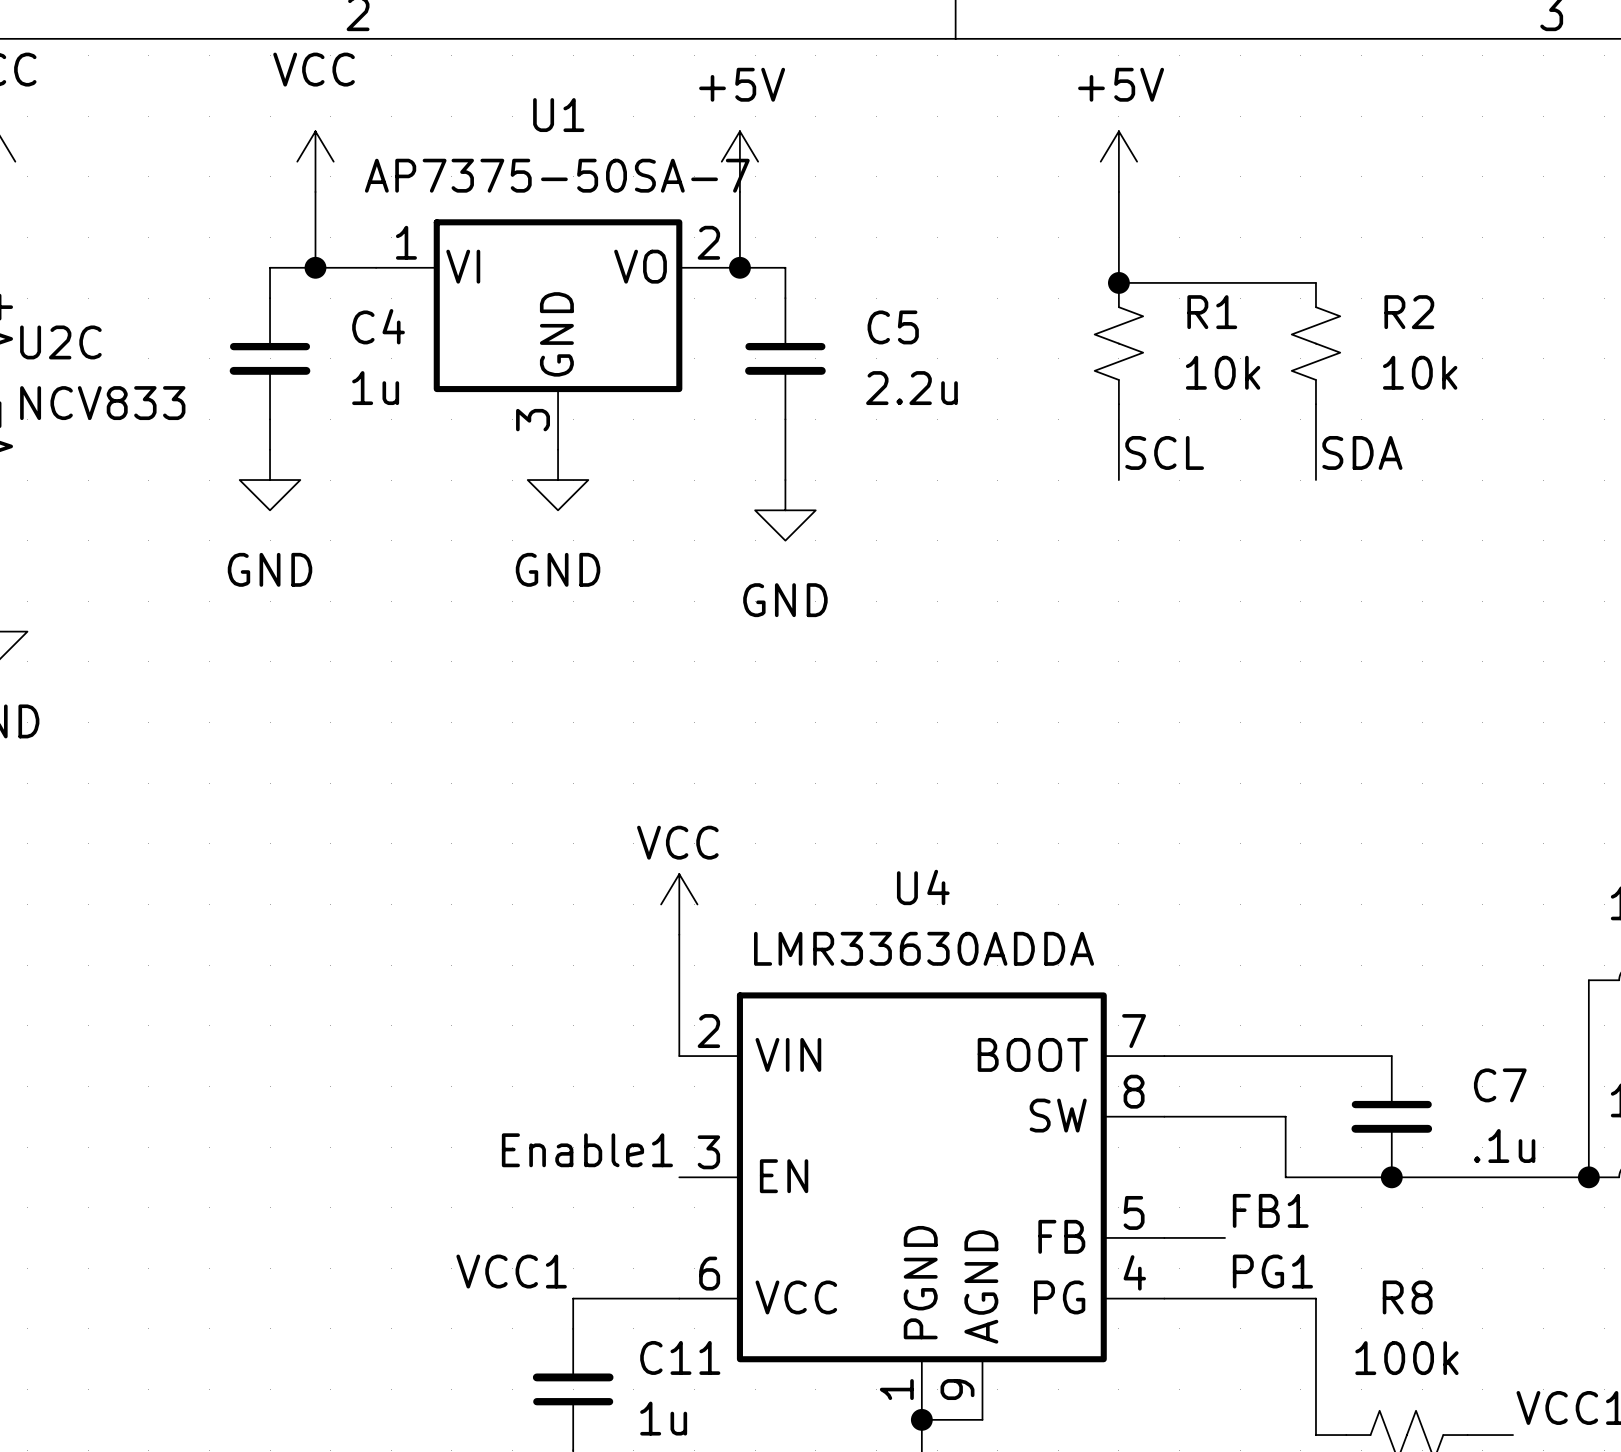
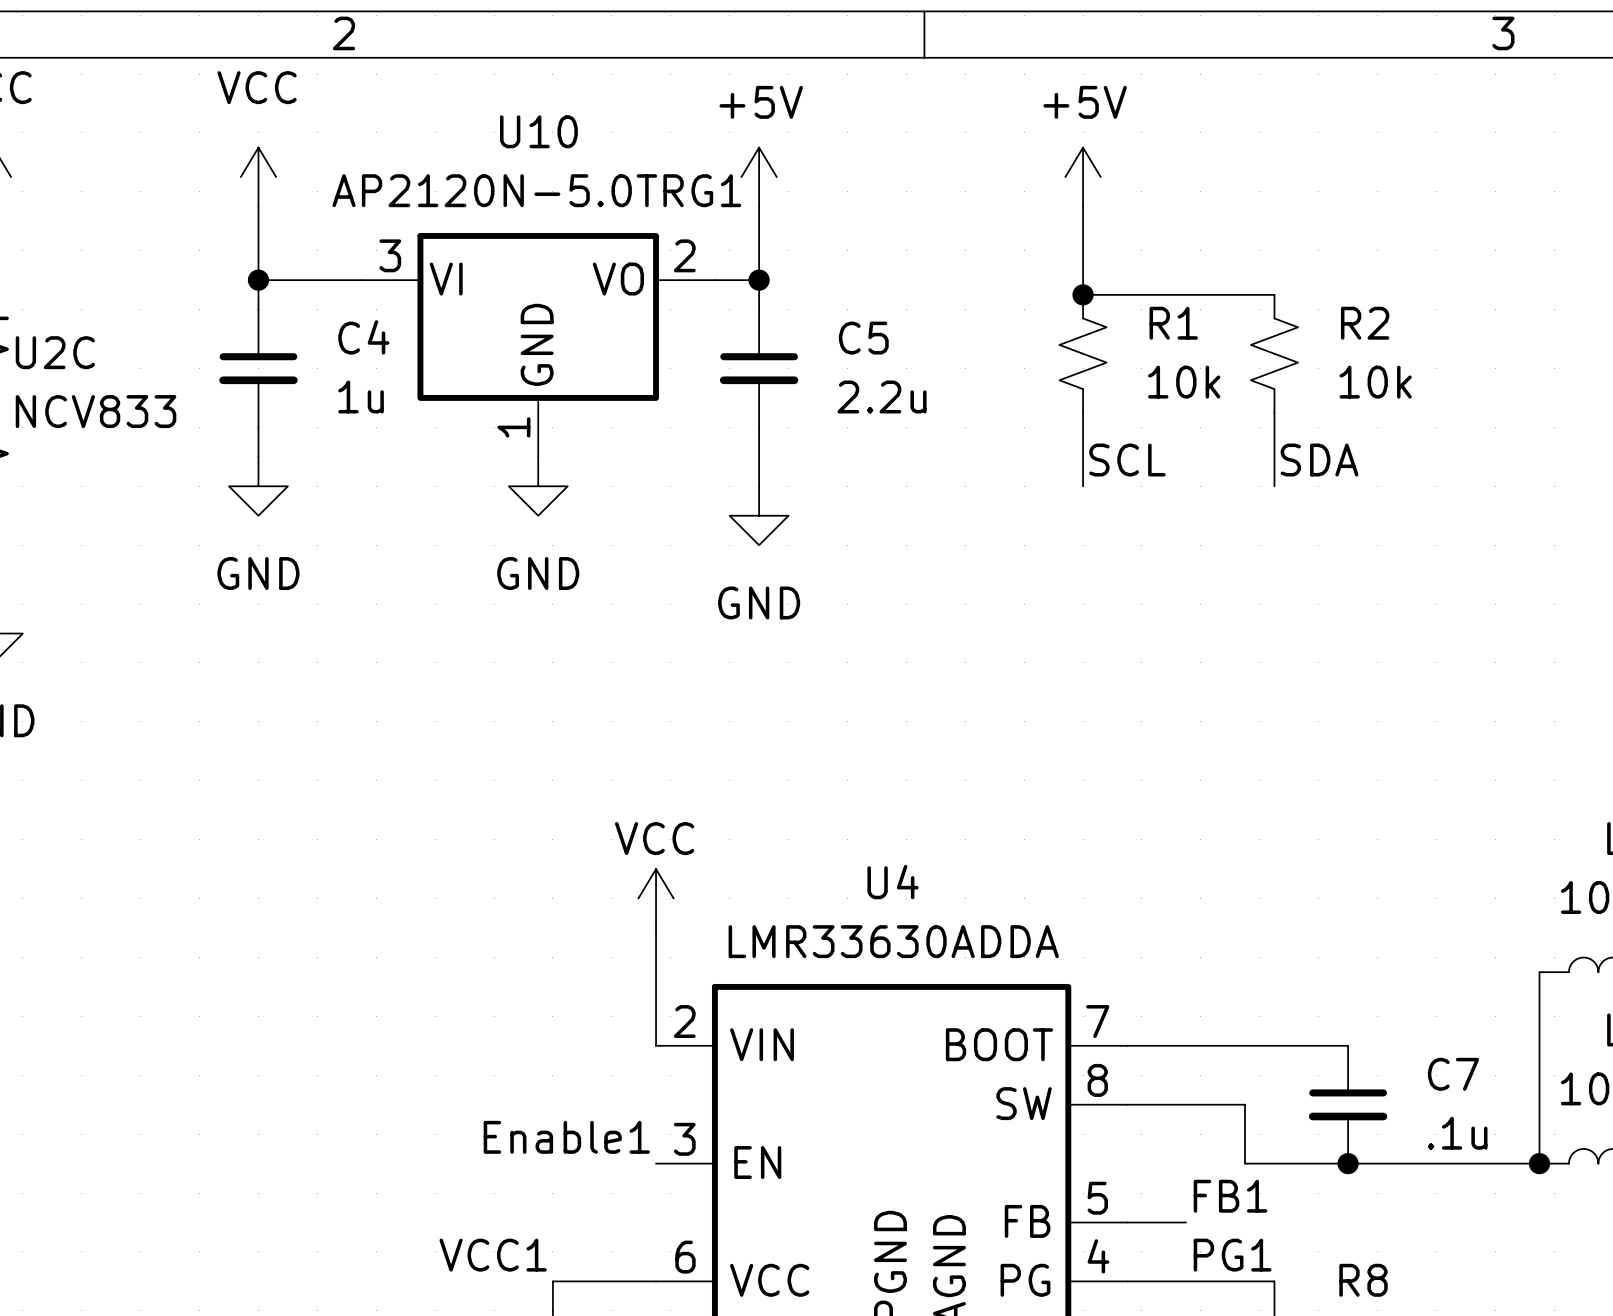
U1 name: U1 (558, 115) -> U10 (538, 131)
power symbol position: VCC (315, 161) -> VCC (258, 177)
power symbol position: +5V (739, 161) -> +5V (759, 177)
U1 value: AP7375-50SA-7 (557, 175) -> AP2120N-5.0TRG1 (536, 190)
wire: (315, 191) (315, 267) -> (258, 206) (258, 280)
wire: (739, 191) (739, 267) -> (759, 206) (759, 280)
U1 pin number: 1 (406, 242) -> 3 (390, 255)
junction position: (315, 267) -> (258, 280)
junction position: (739, 267) -> (759, 280)
U1 pin number: 3 (533, 420) -> 1 (513, 427)

